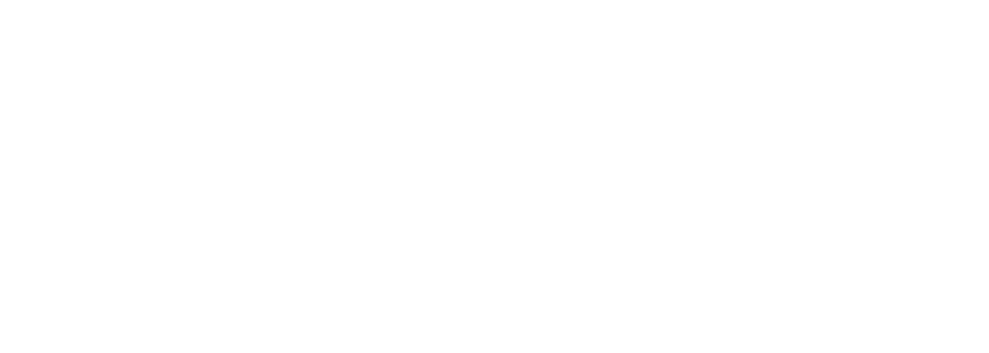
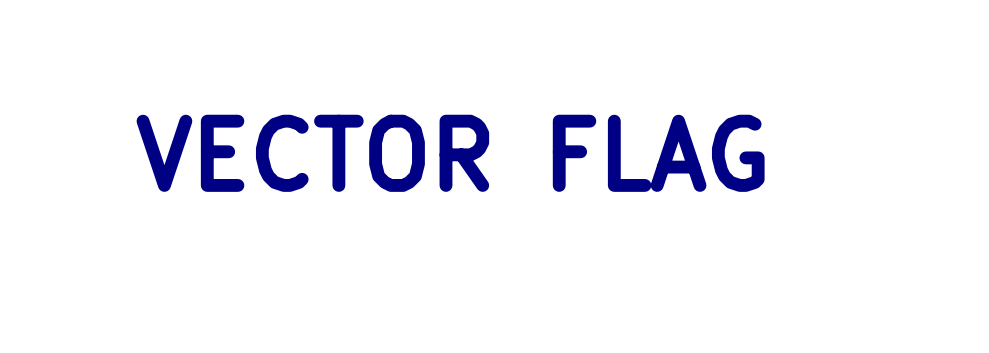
text: none -> VECTOR FLAG (450, 153)

